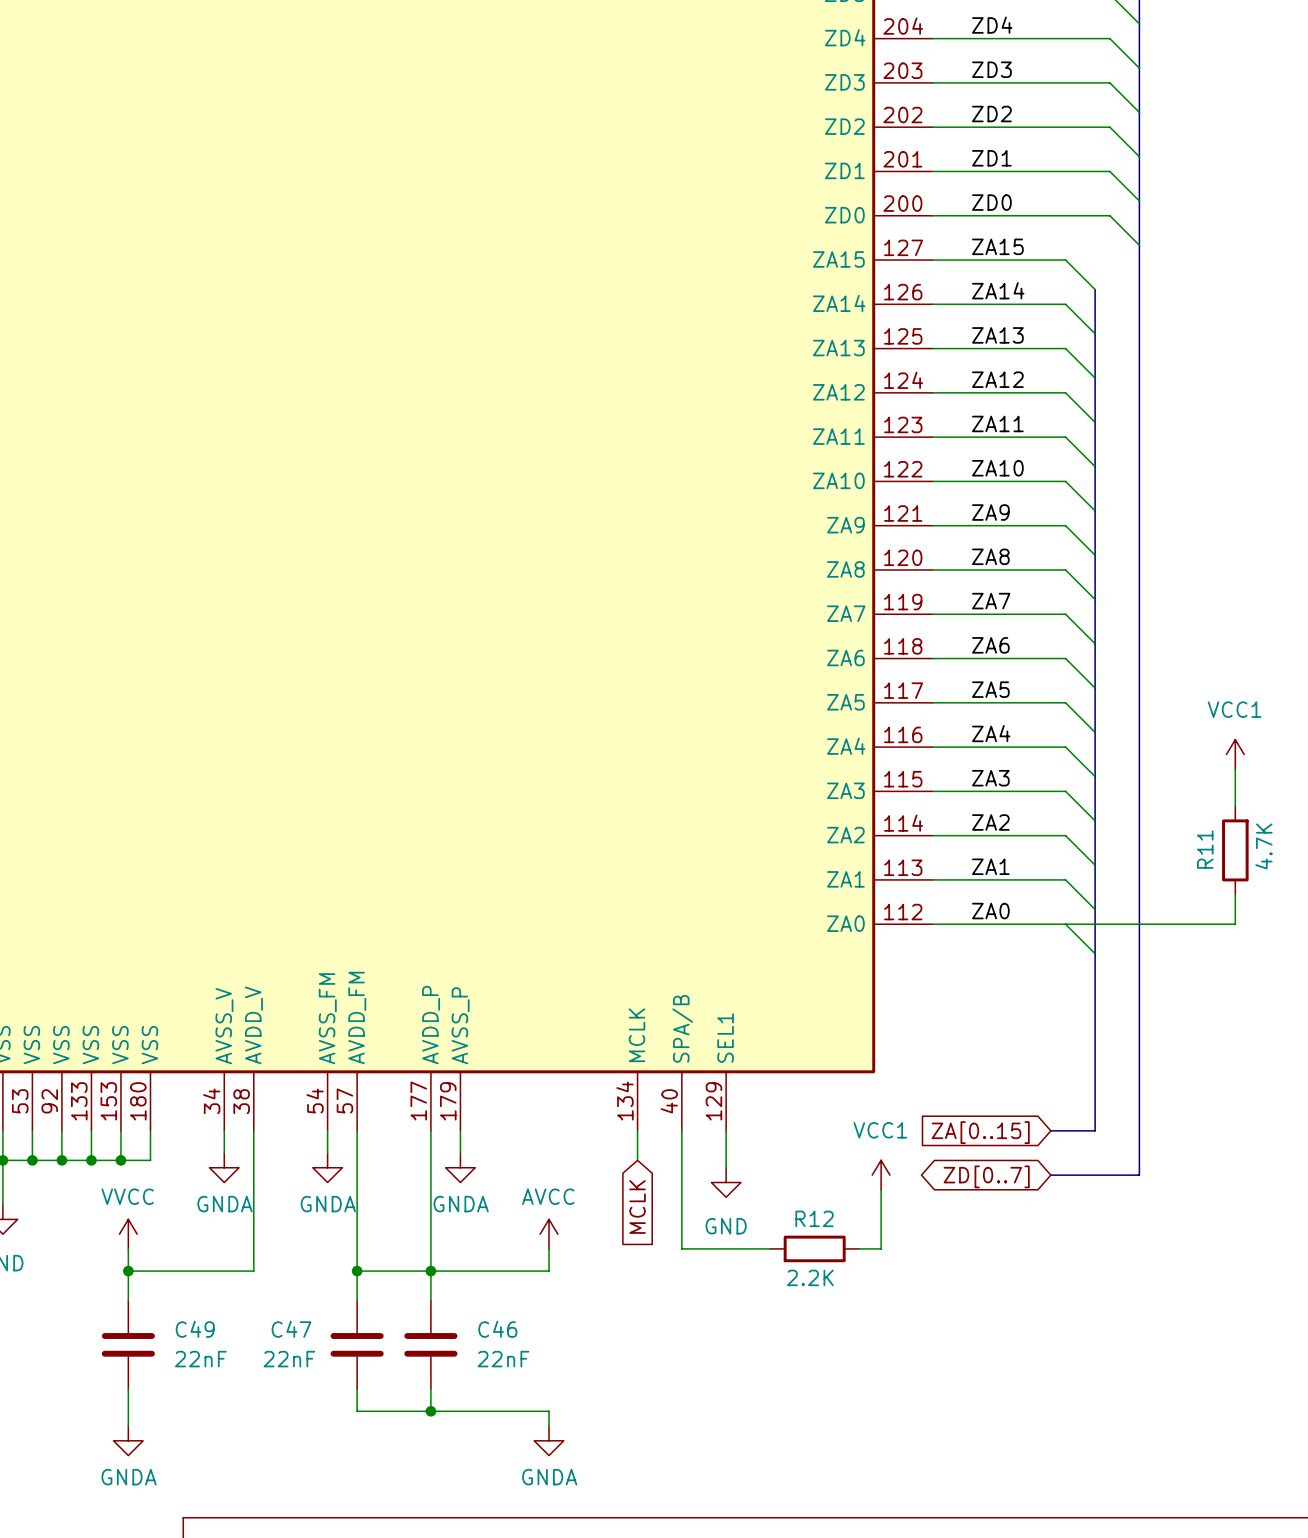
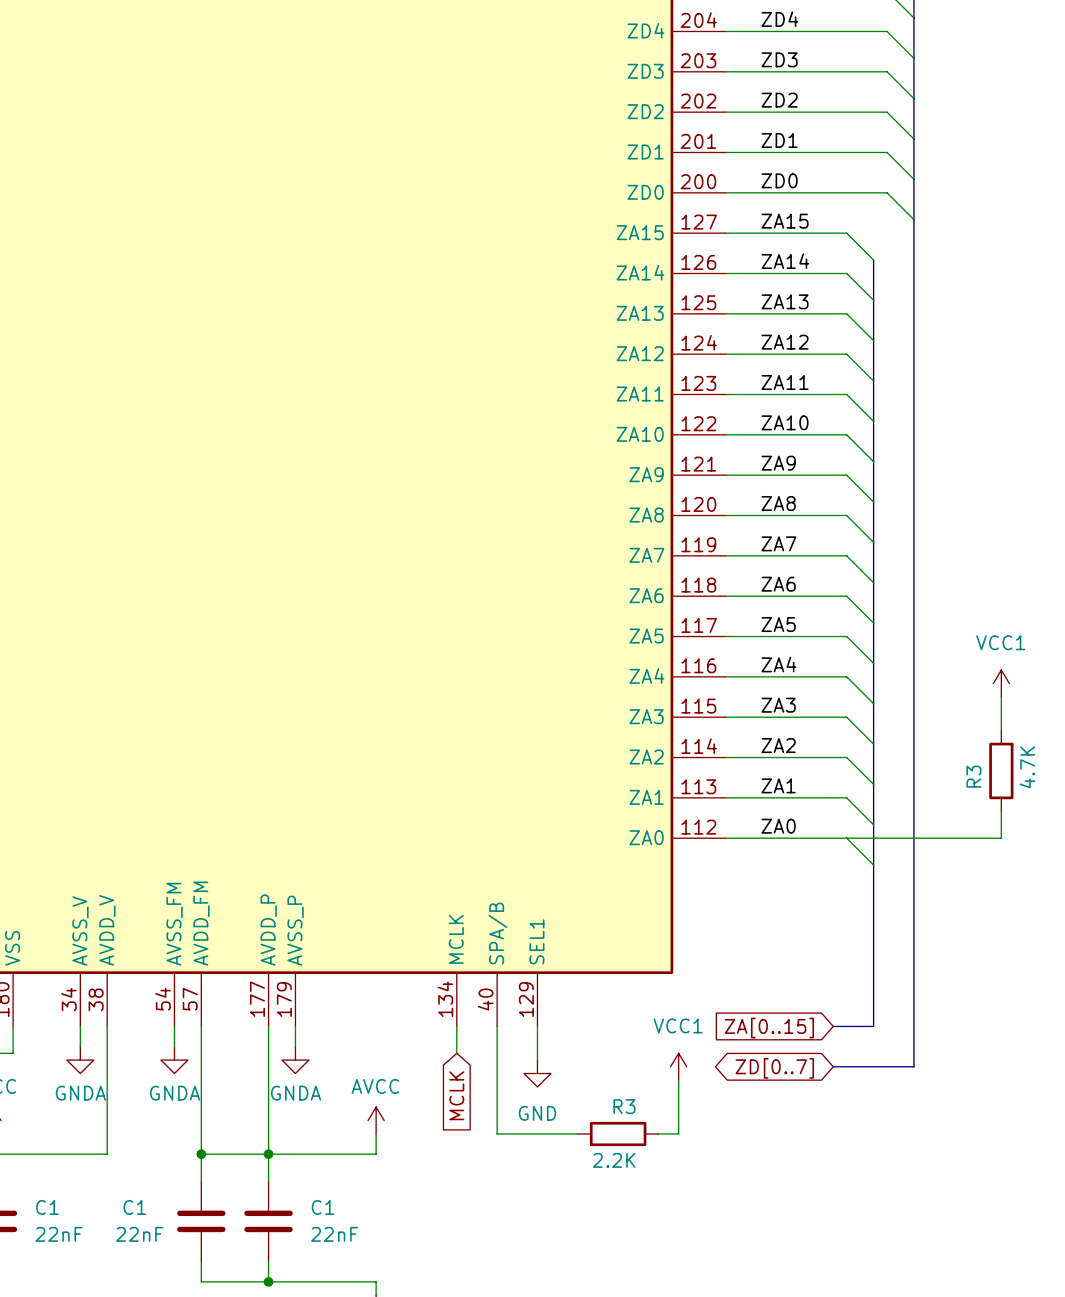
R11 name: R11 (1205, 849) -> R3 (973, 776)
R12 name: R12 (814, 1218) -> R3 (624, 1106)
C49 name: C49 (195, 1329) -> C1 (47, 1207)
C47 name: C47 (291, 1329) -> C1 (134, 1207)
C46 name: C46 (497, 1329) -> C1 (323, 1207)

